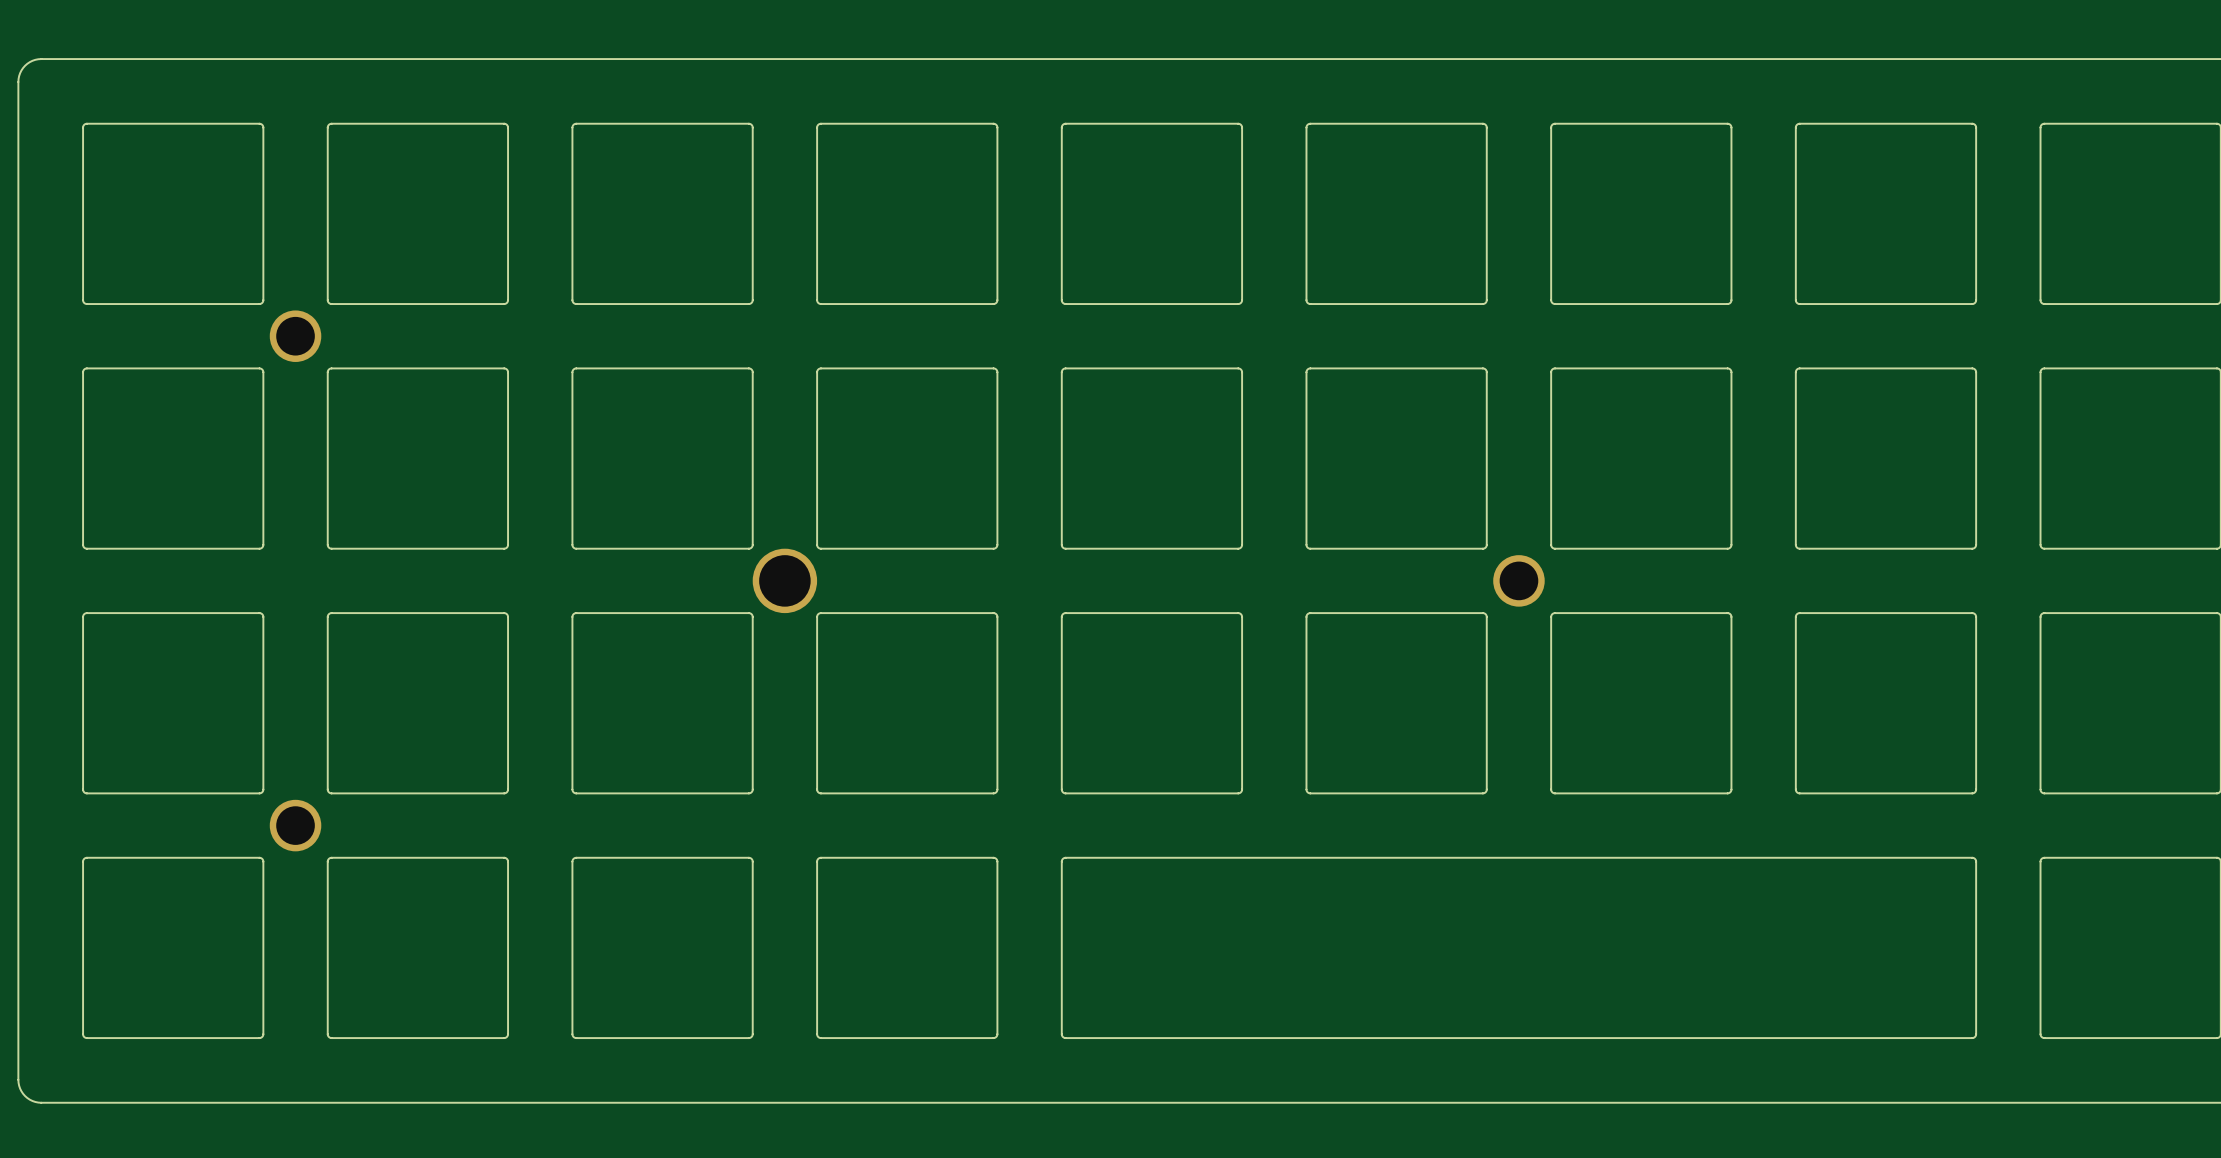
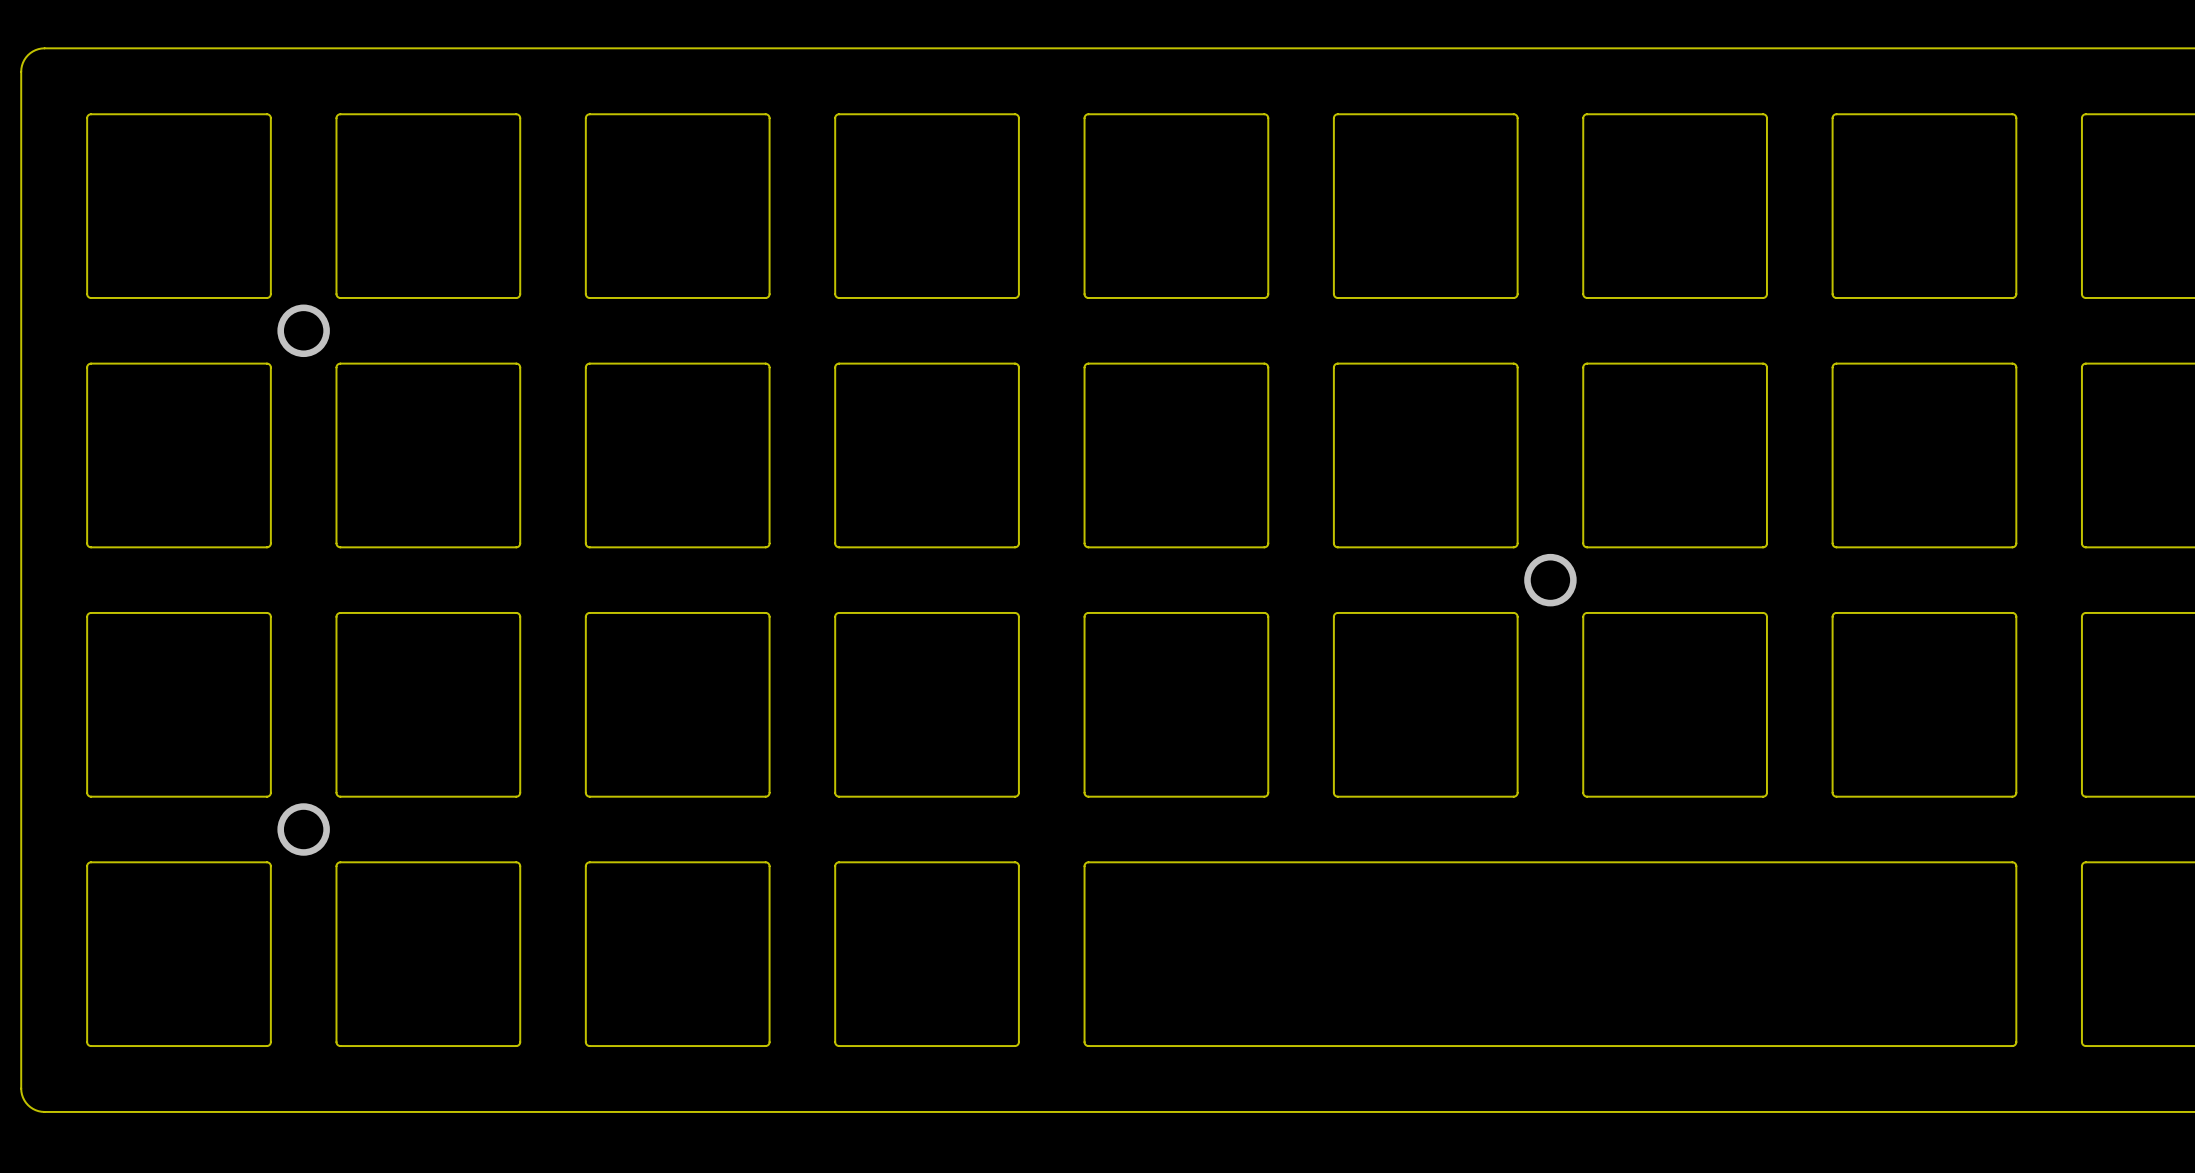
via: (784, 580) -> none

